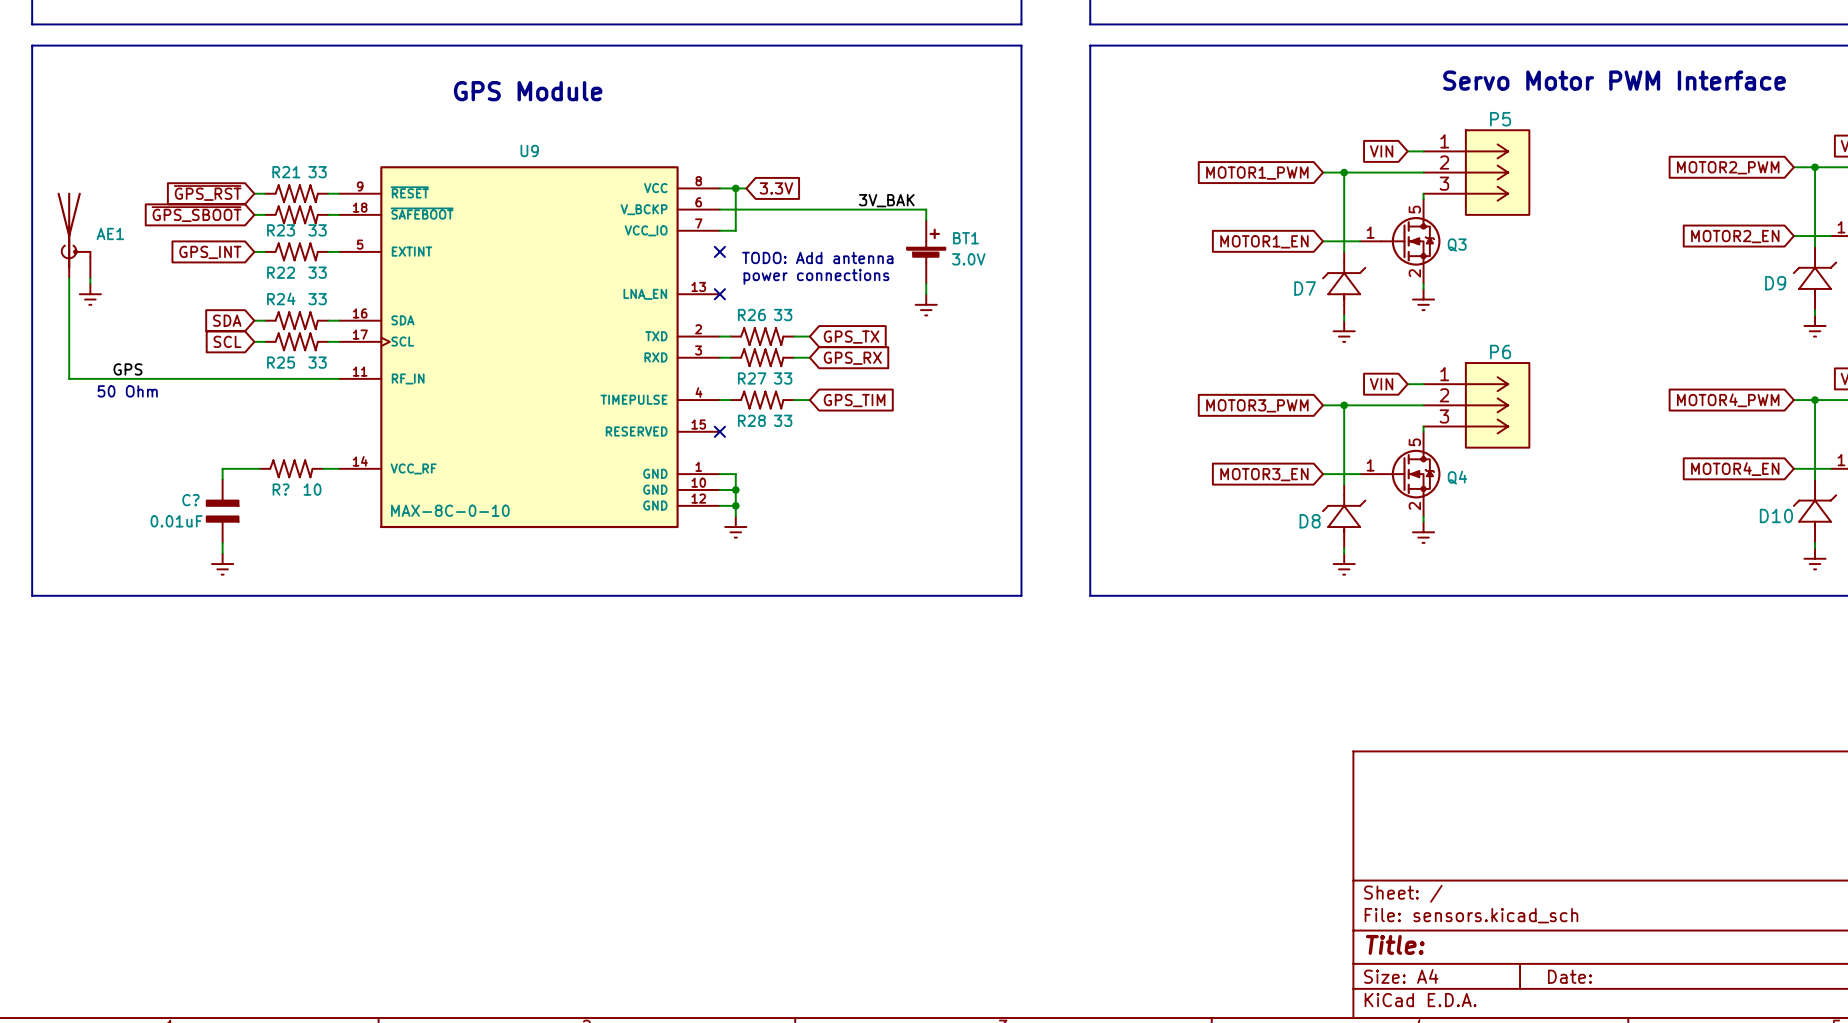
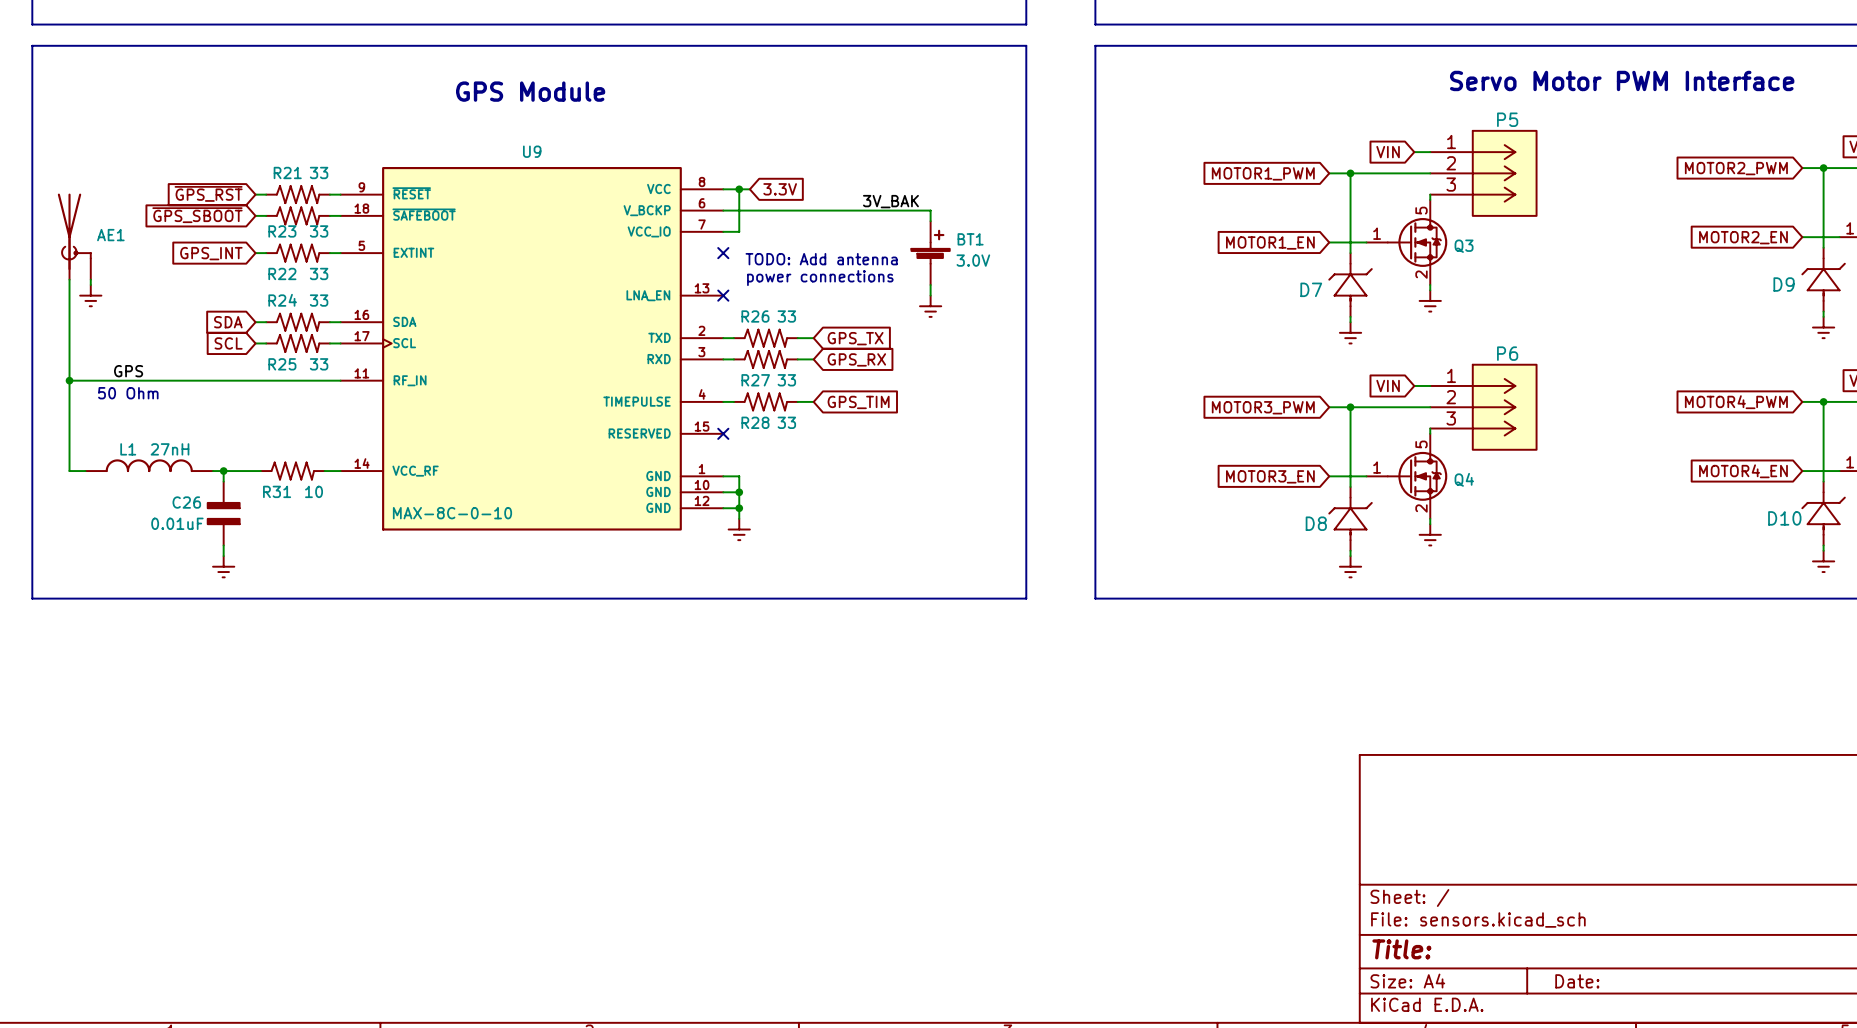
wire: none -> (69, 380) (69, 471) (85, 471)
junction: none -> (69, 380)
L1: none -> 27nH (149, 465)
wire: none -> (213, 471) (223, 471)
junction: none -> (223, 471)
R? name: R? (281, 489) -> R31 (277, 491)
C? name: C? (190, 500) -> C26 (186, 502)

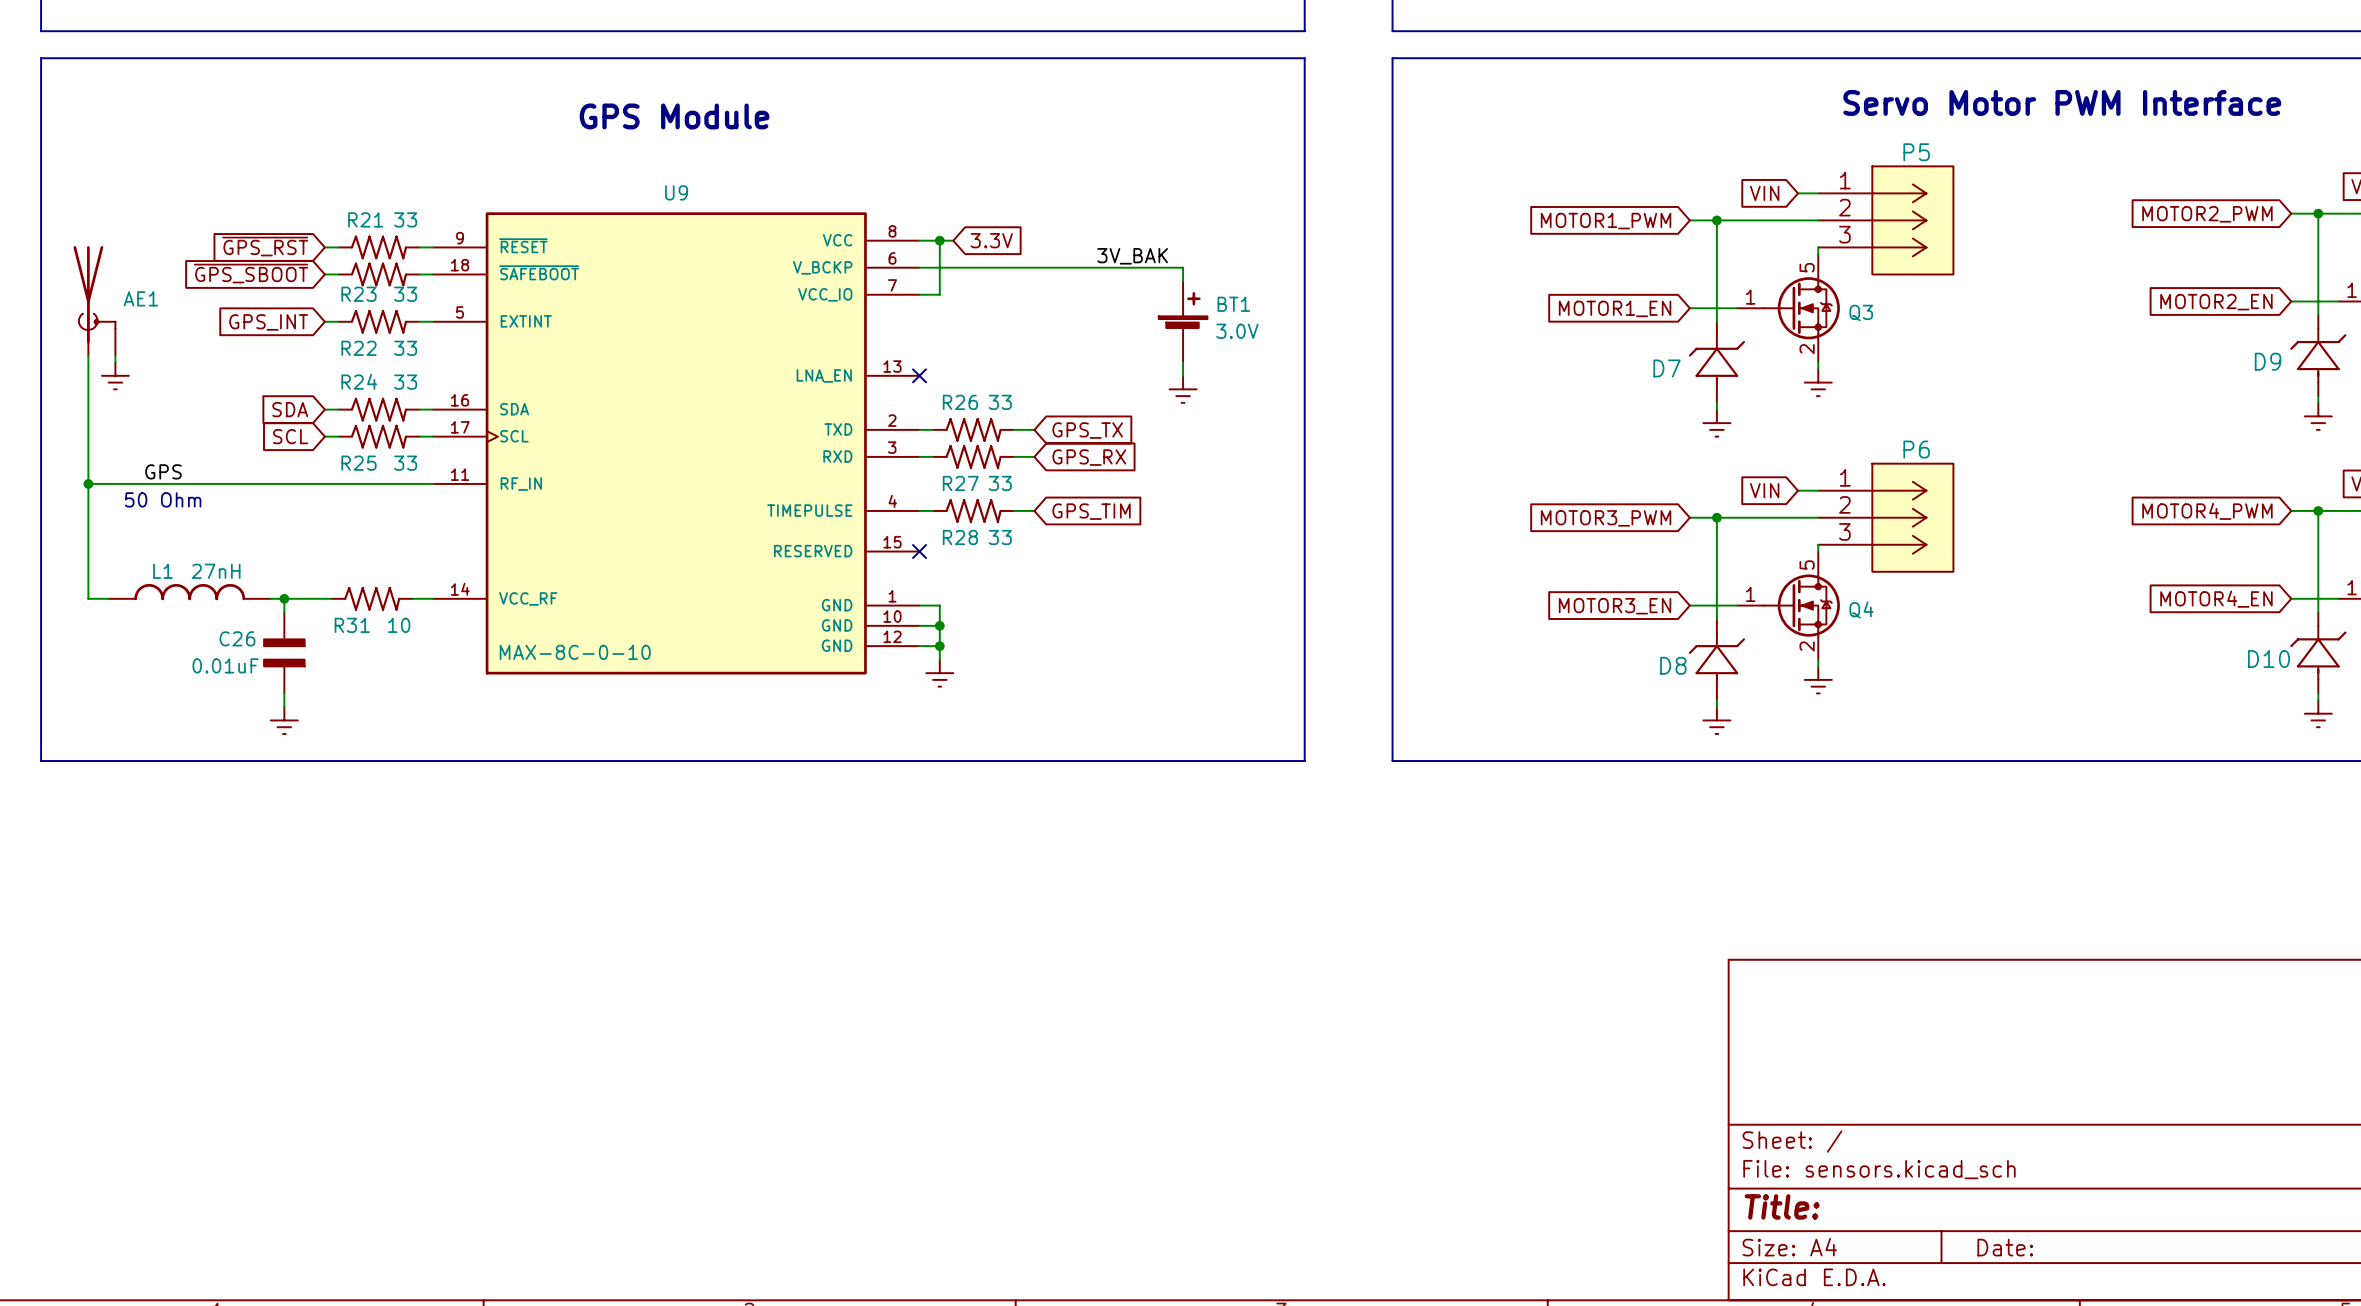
no-connect mark: (723, 253) -> none
text: TODO: Add antenna (821, 259) -> none
text: power connections (820, 278) -> none

